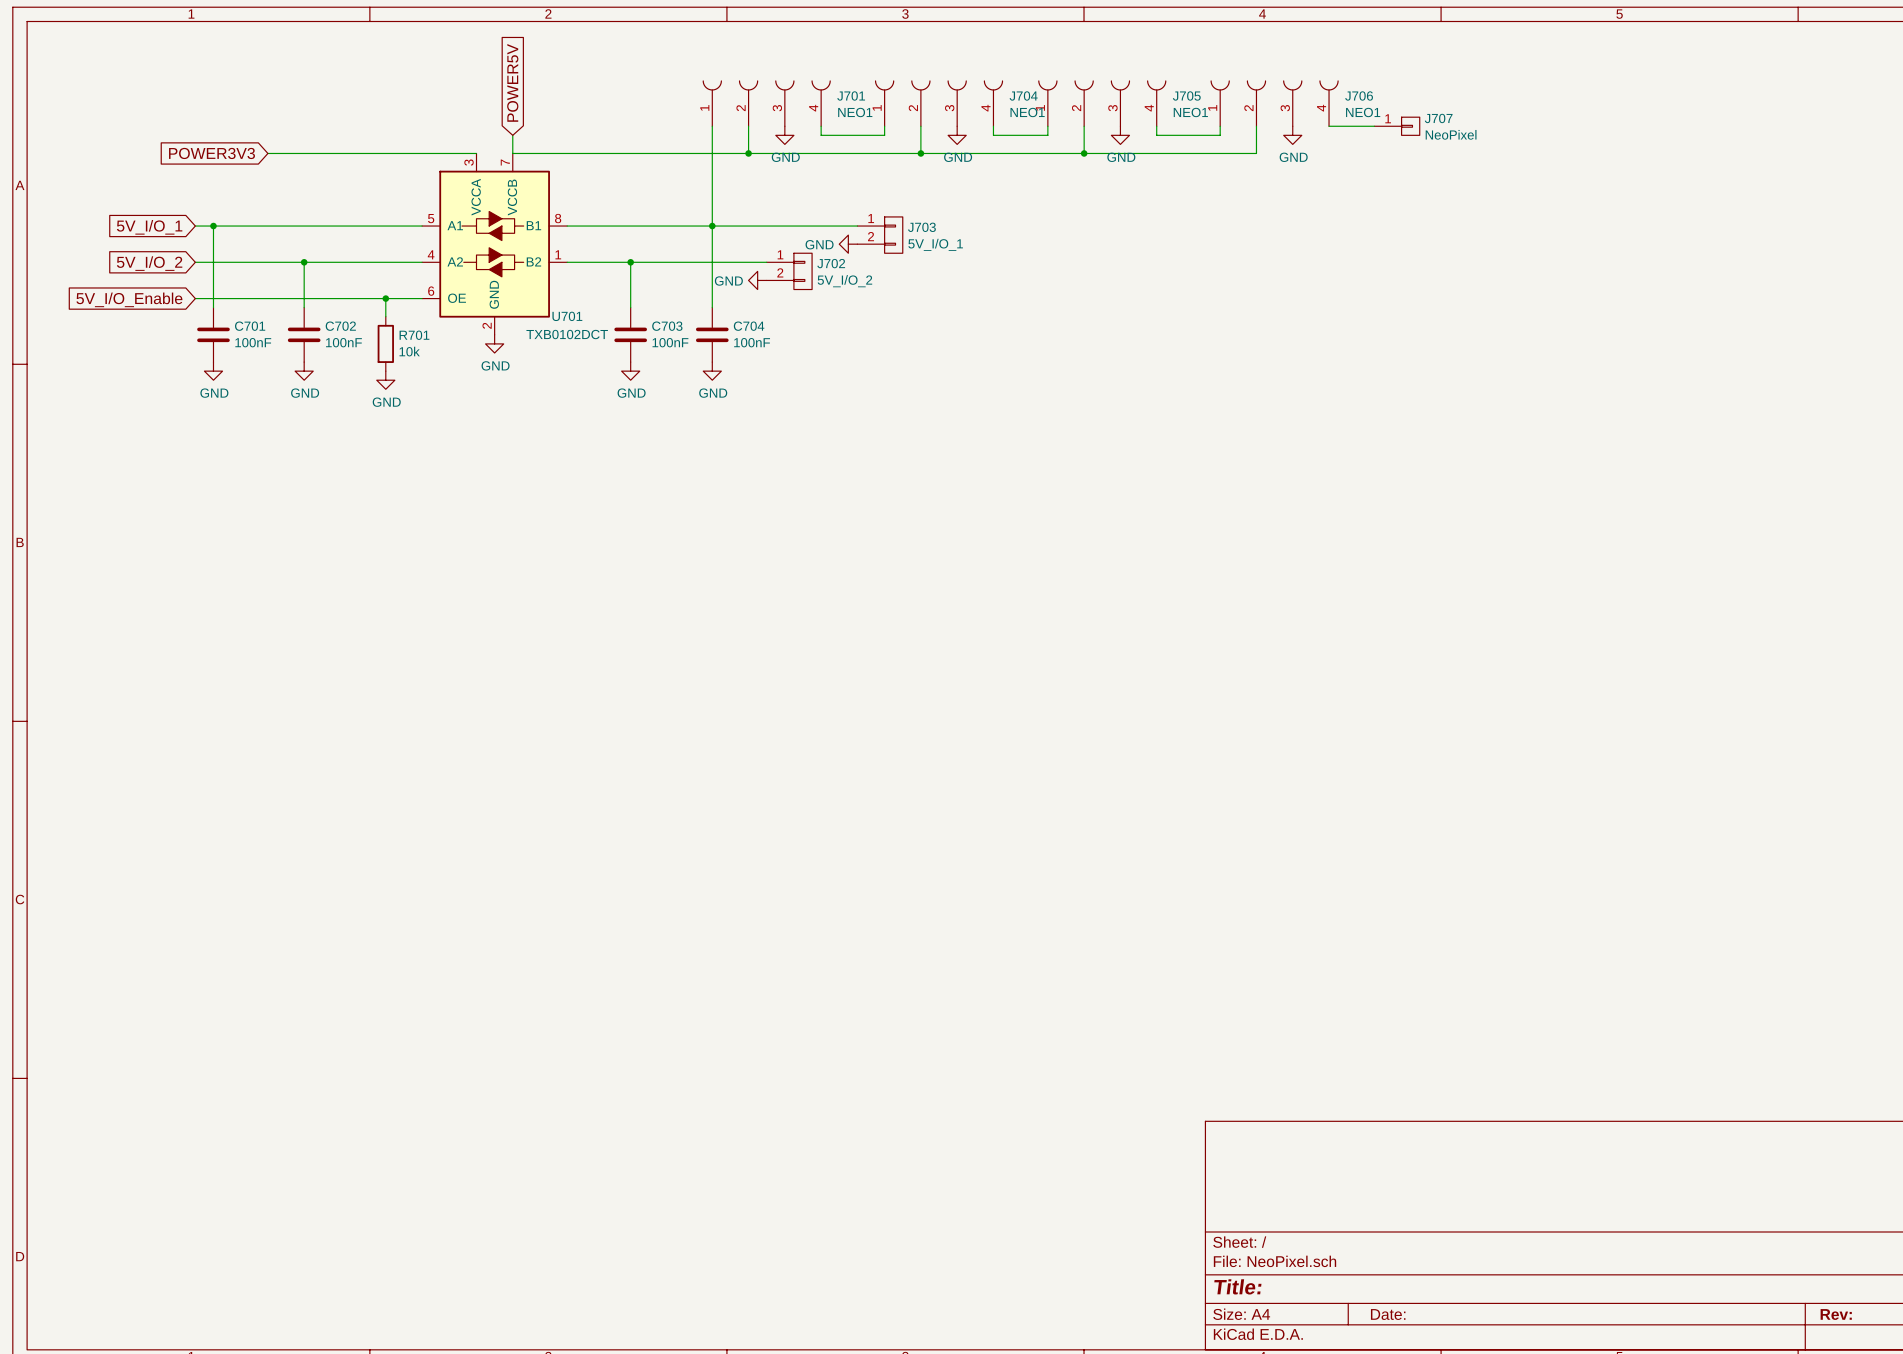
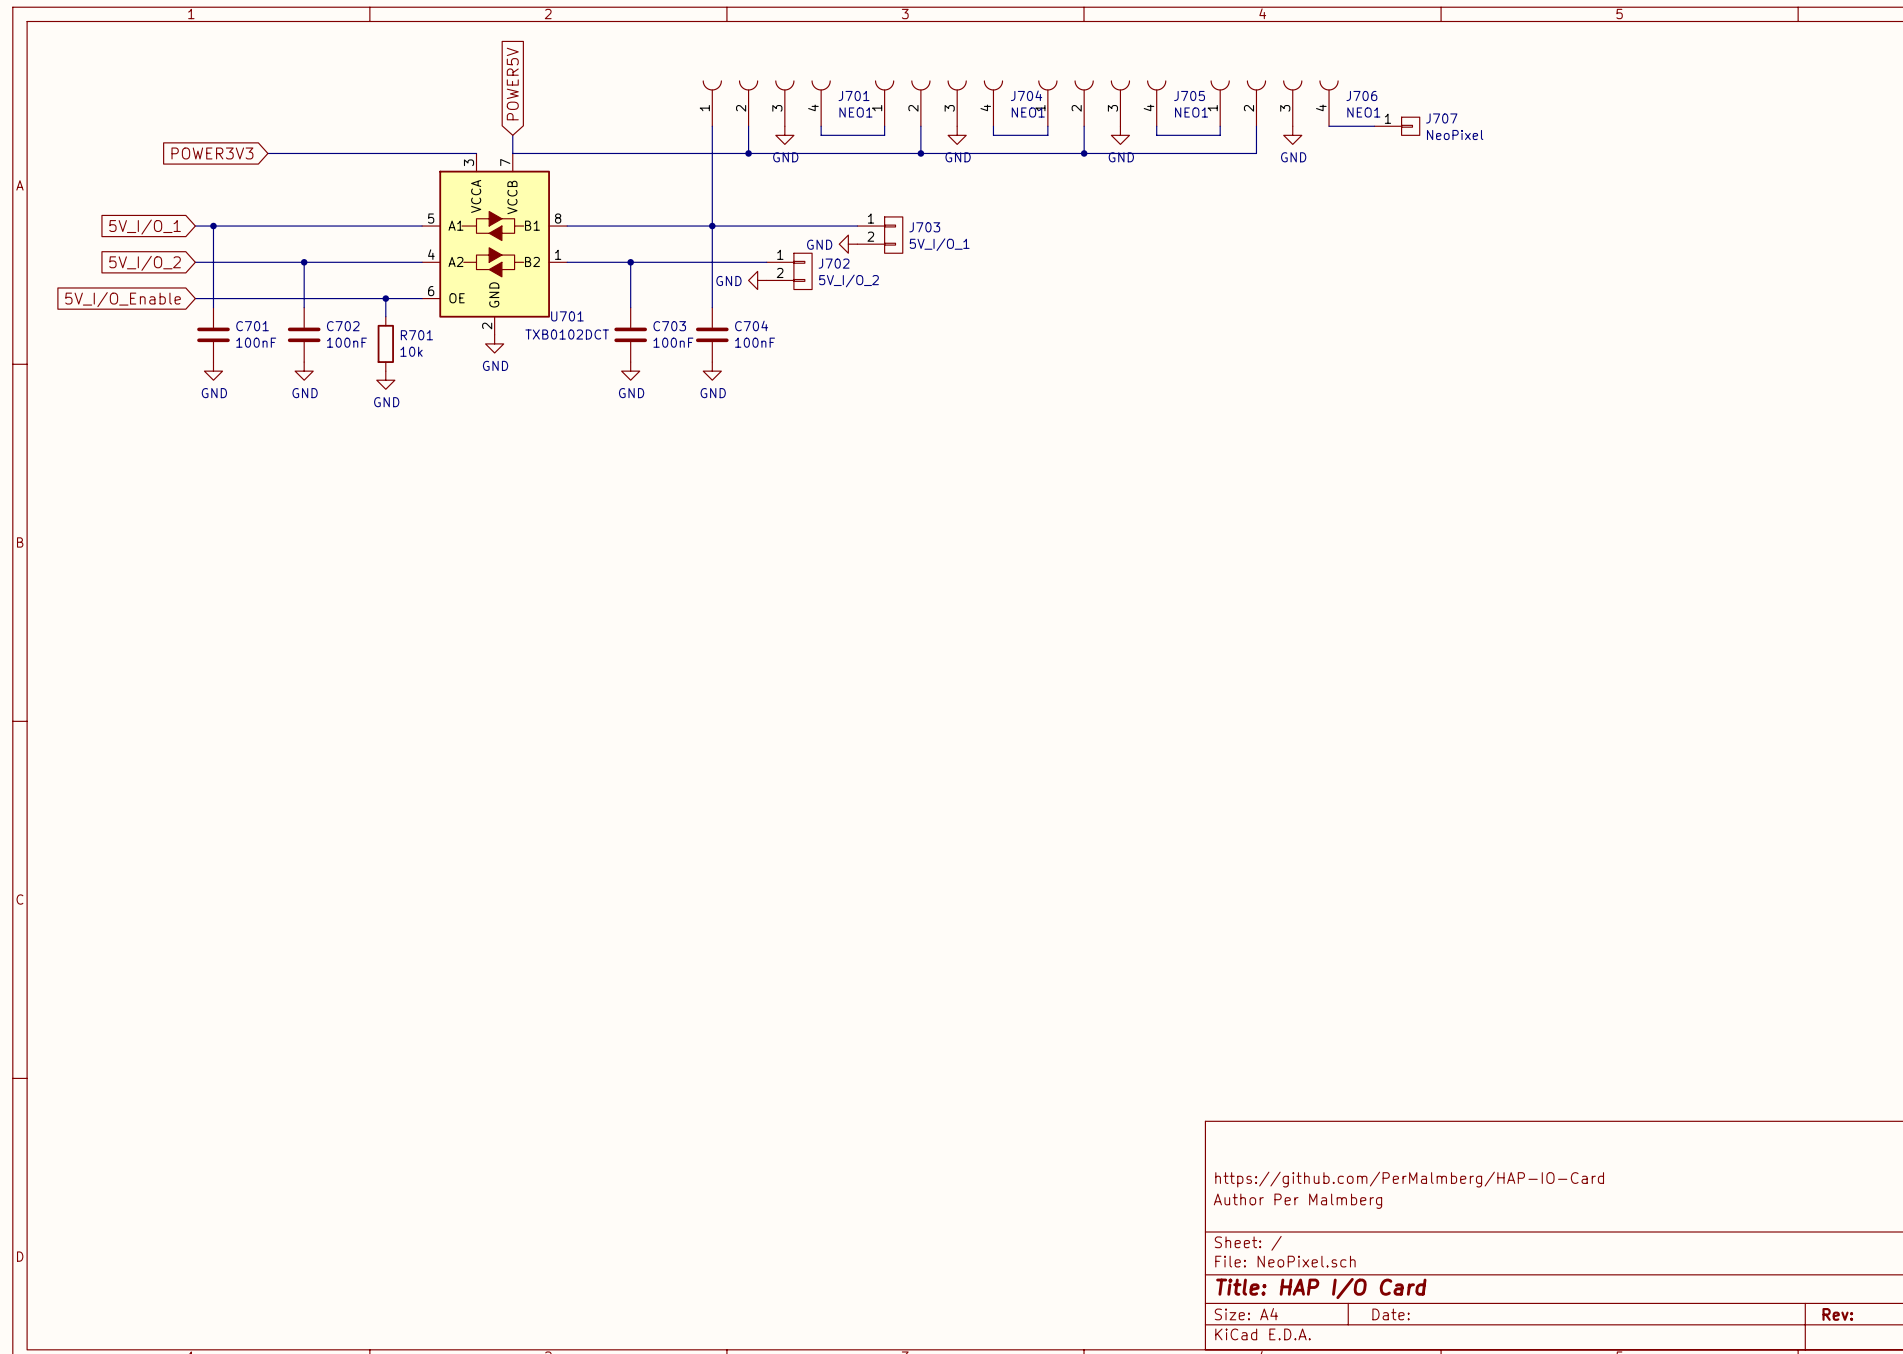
title block: none -> https://github.com/PerMalmberg/HAP-IO-Card (1409, 1179)
title block: none -> Author Per Malmberg (1297, 1201)
title block: Title: (1237, 1286) -> Title: HAP I/O Card (1321, 1288)

